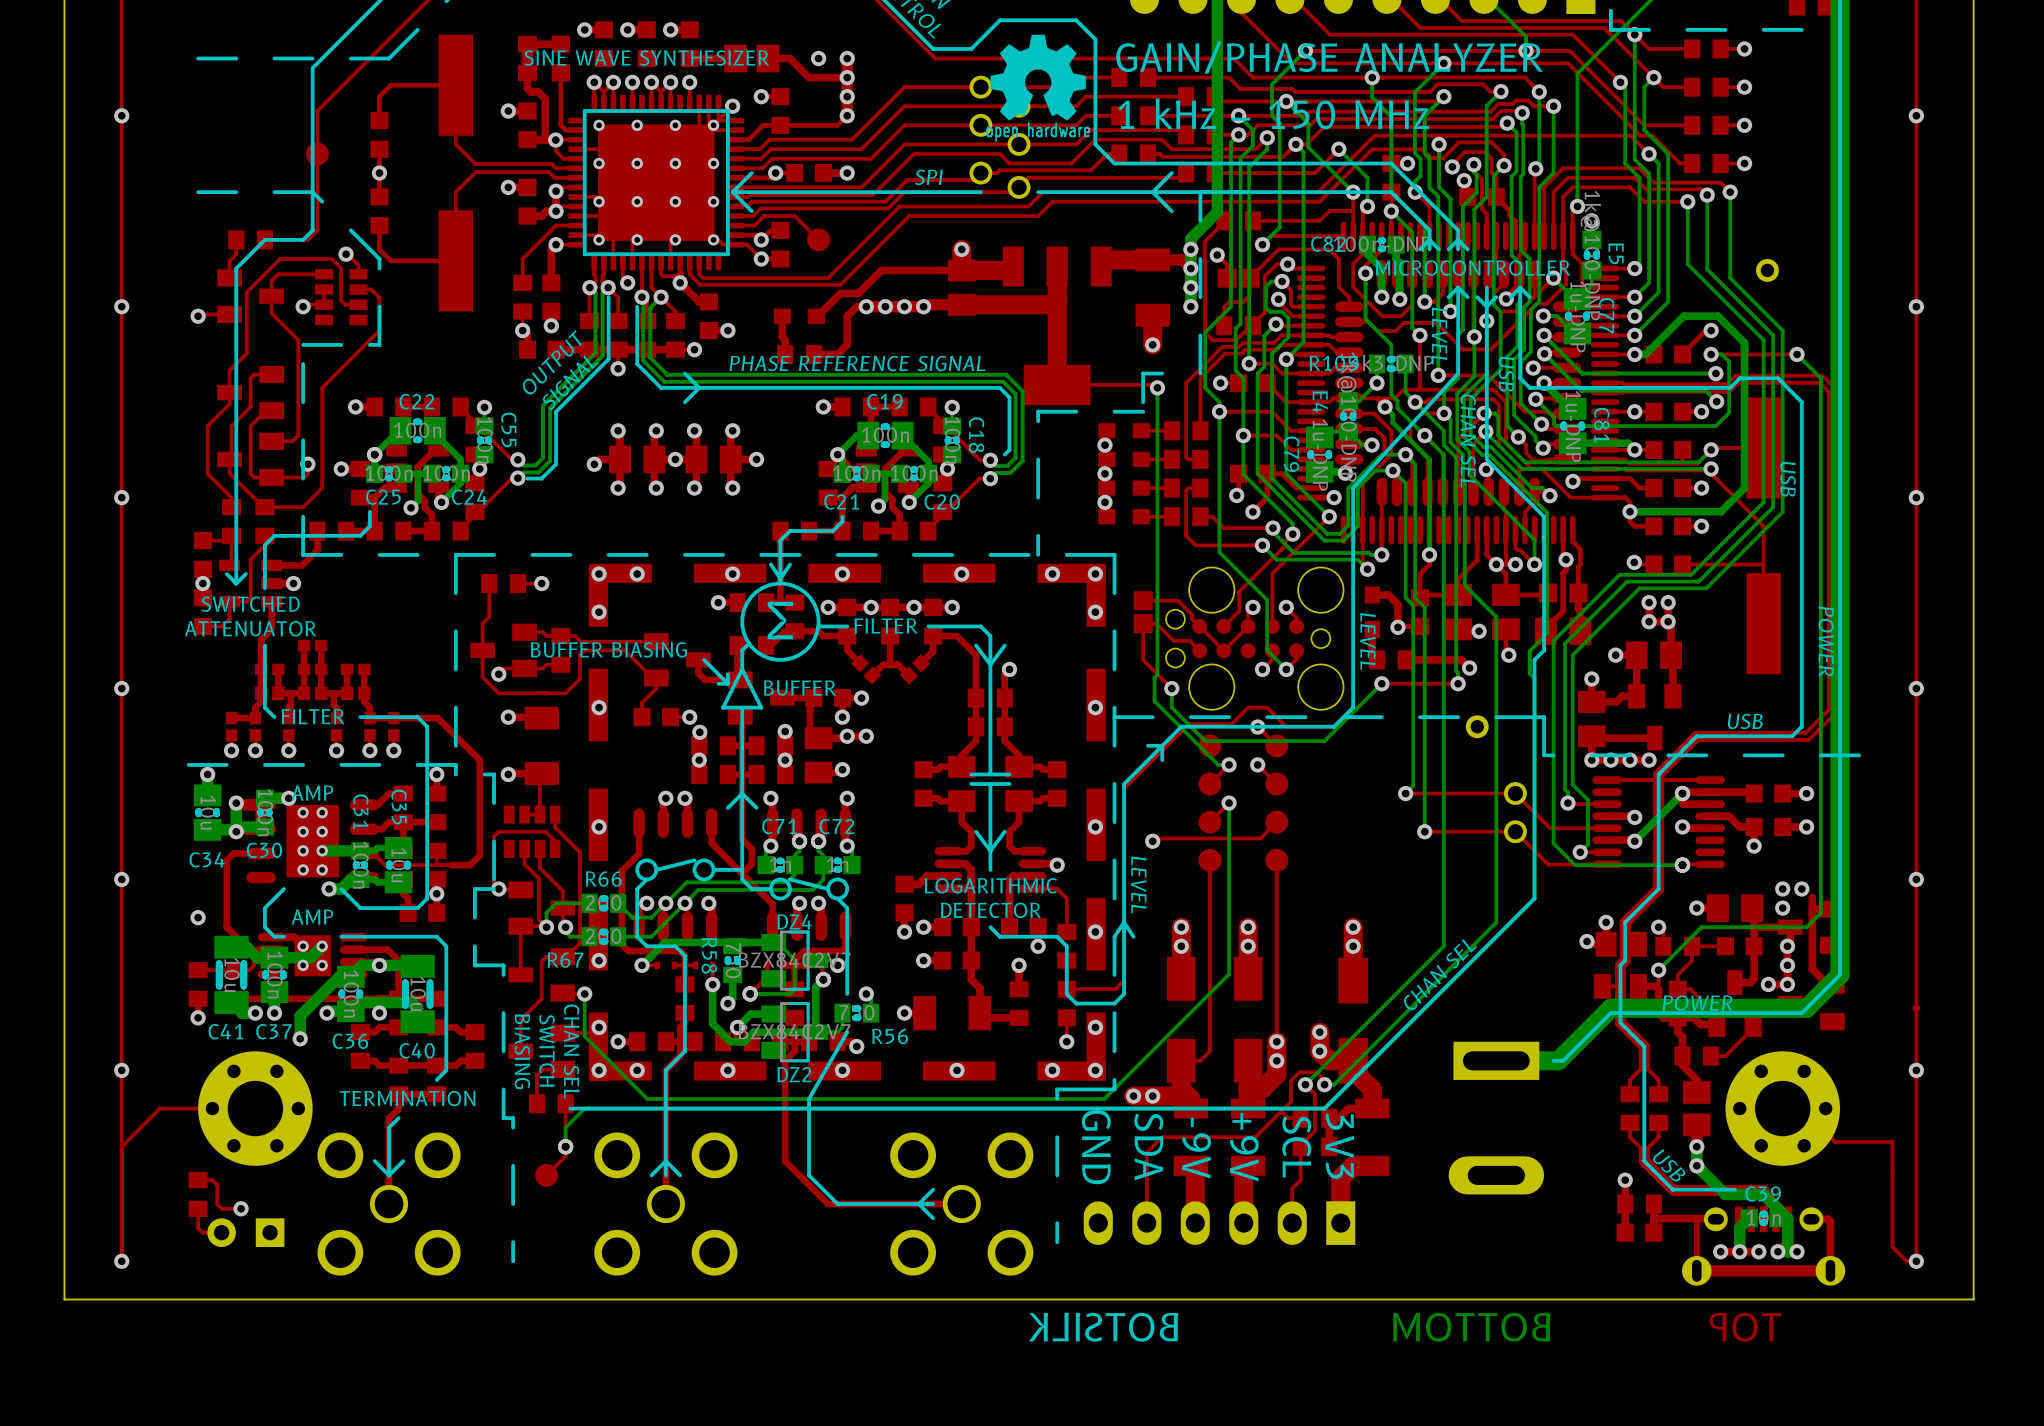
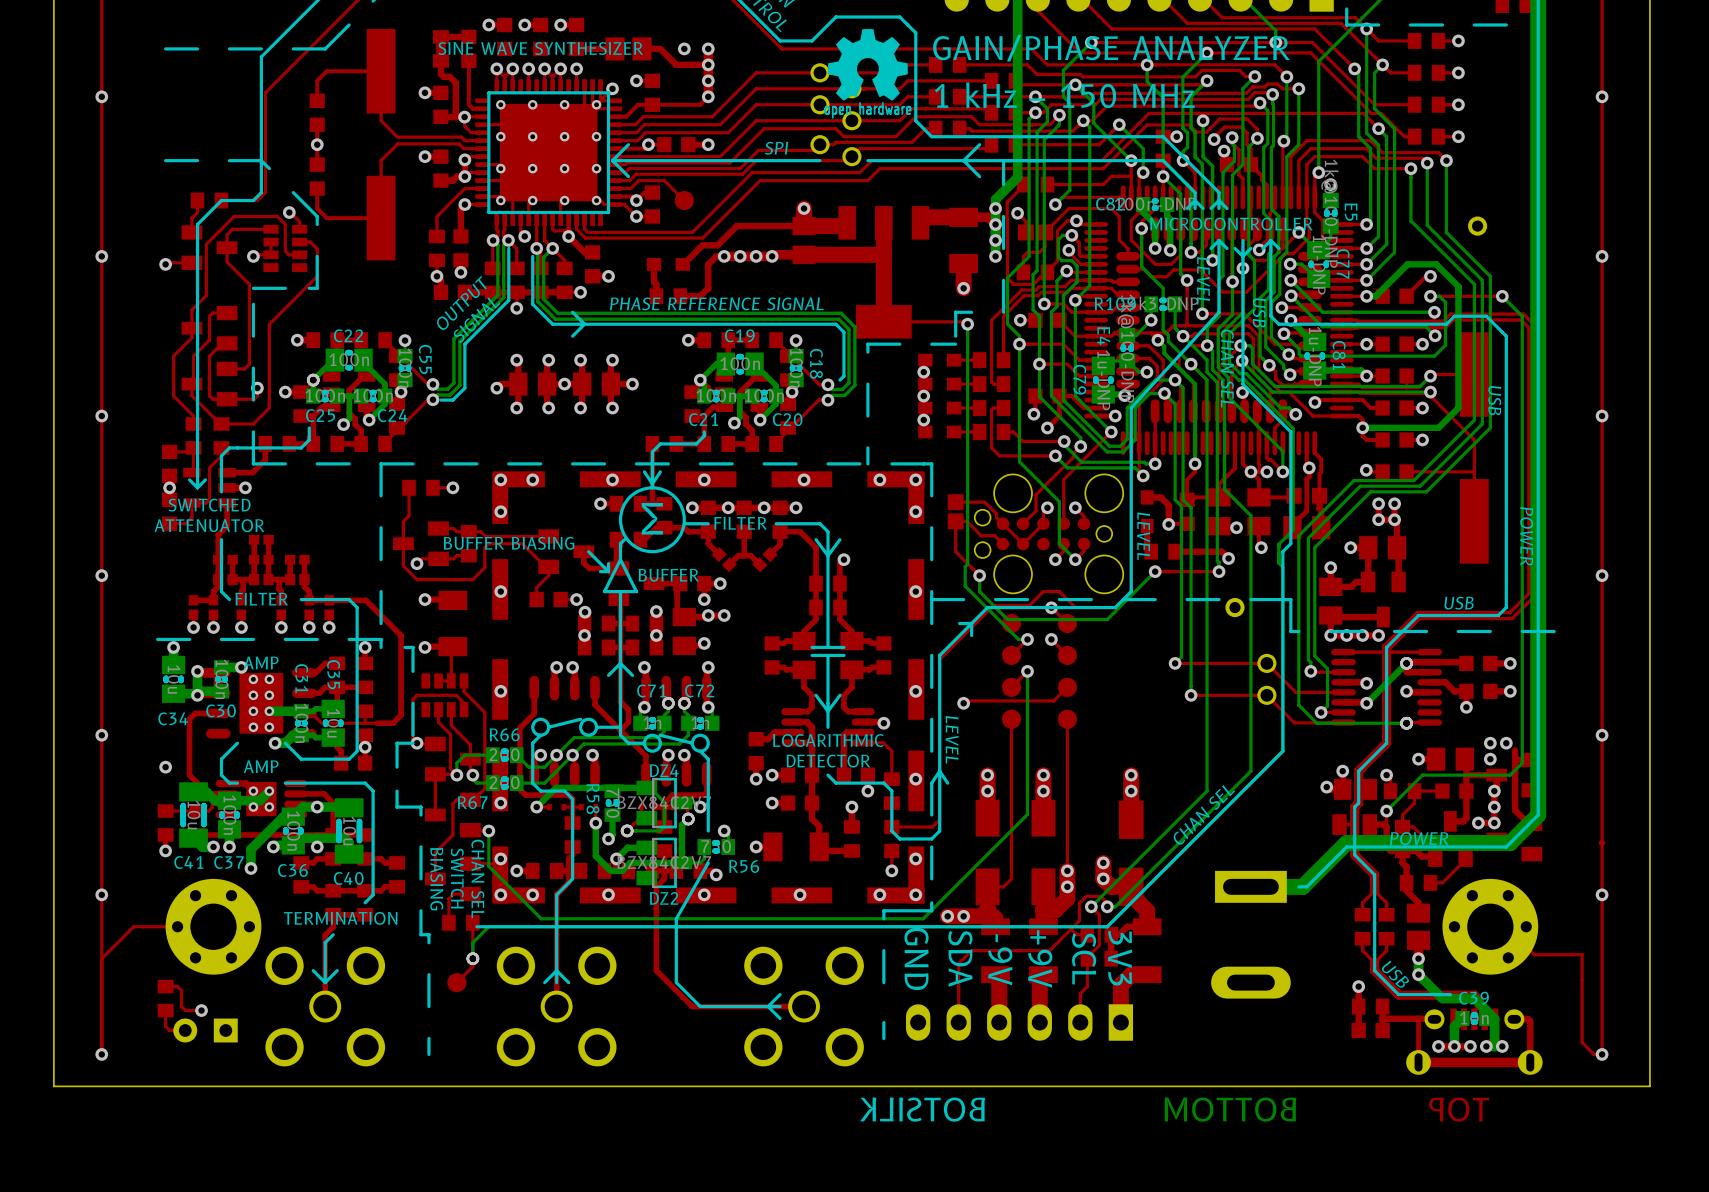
part: (317, 153) -> none

